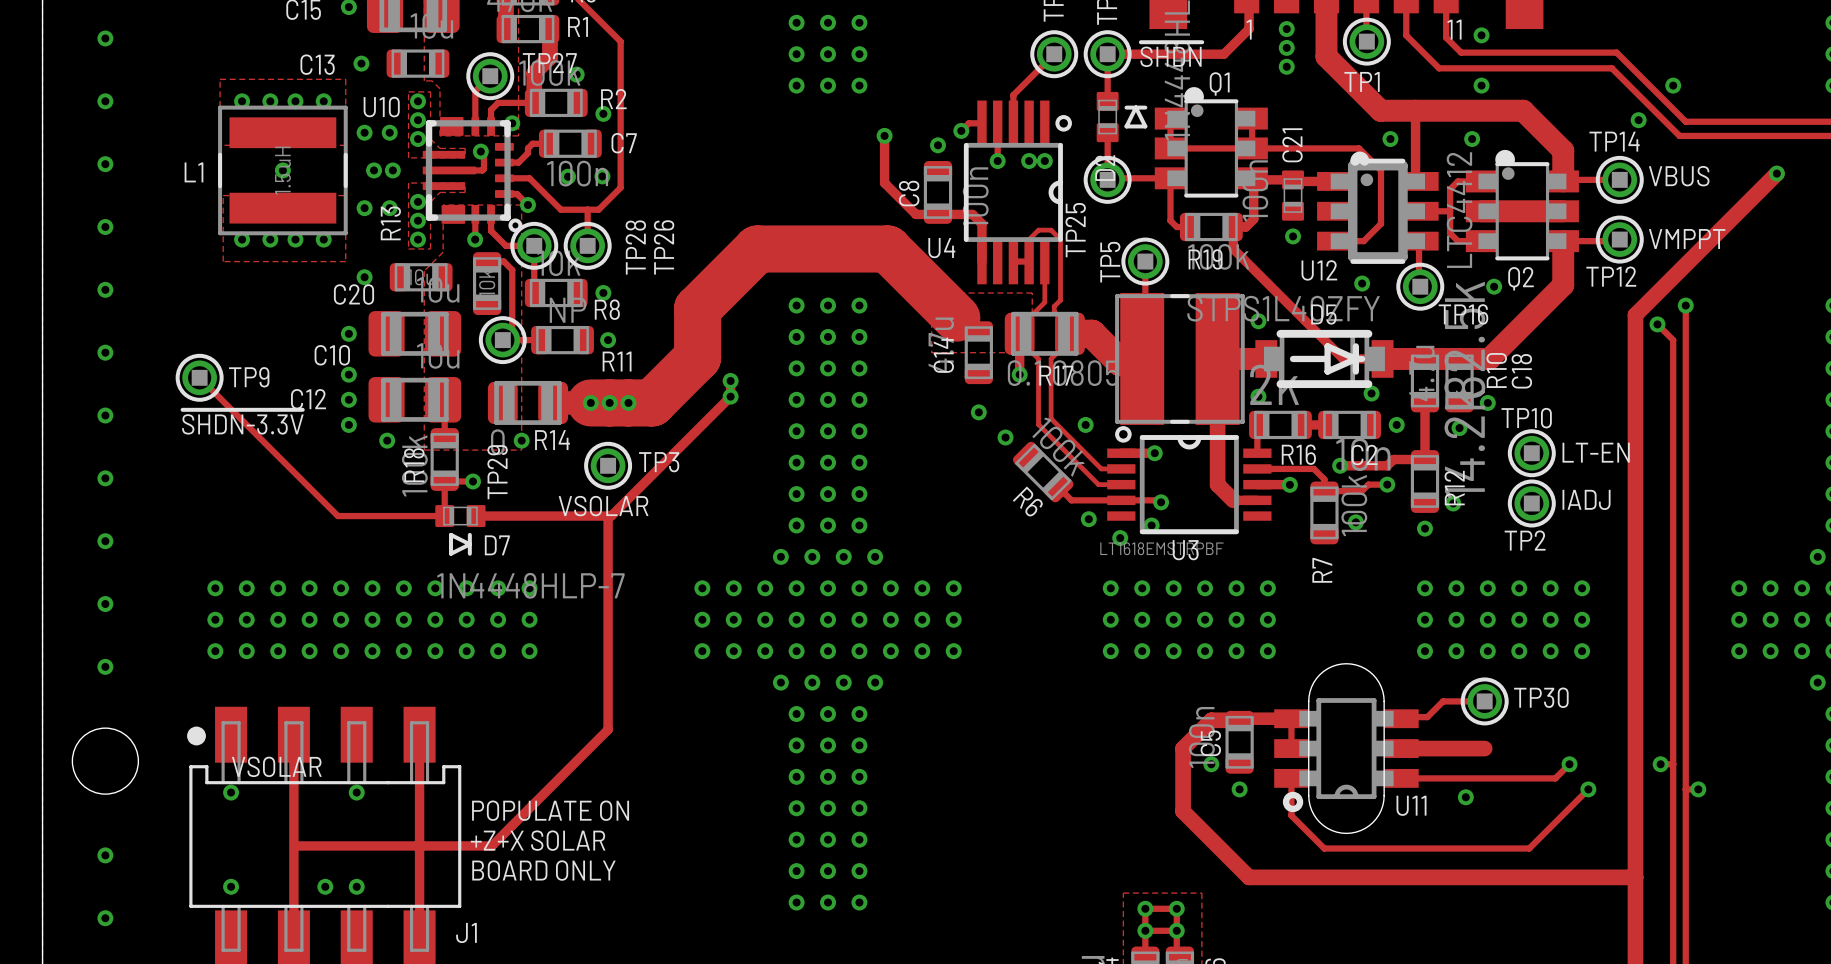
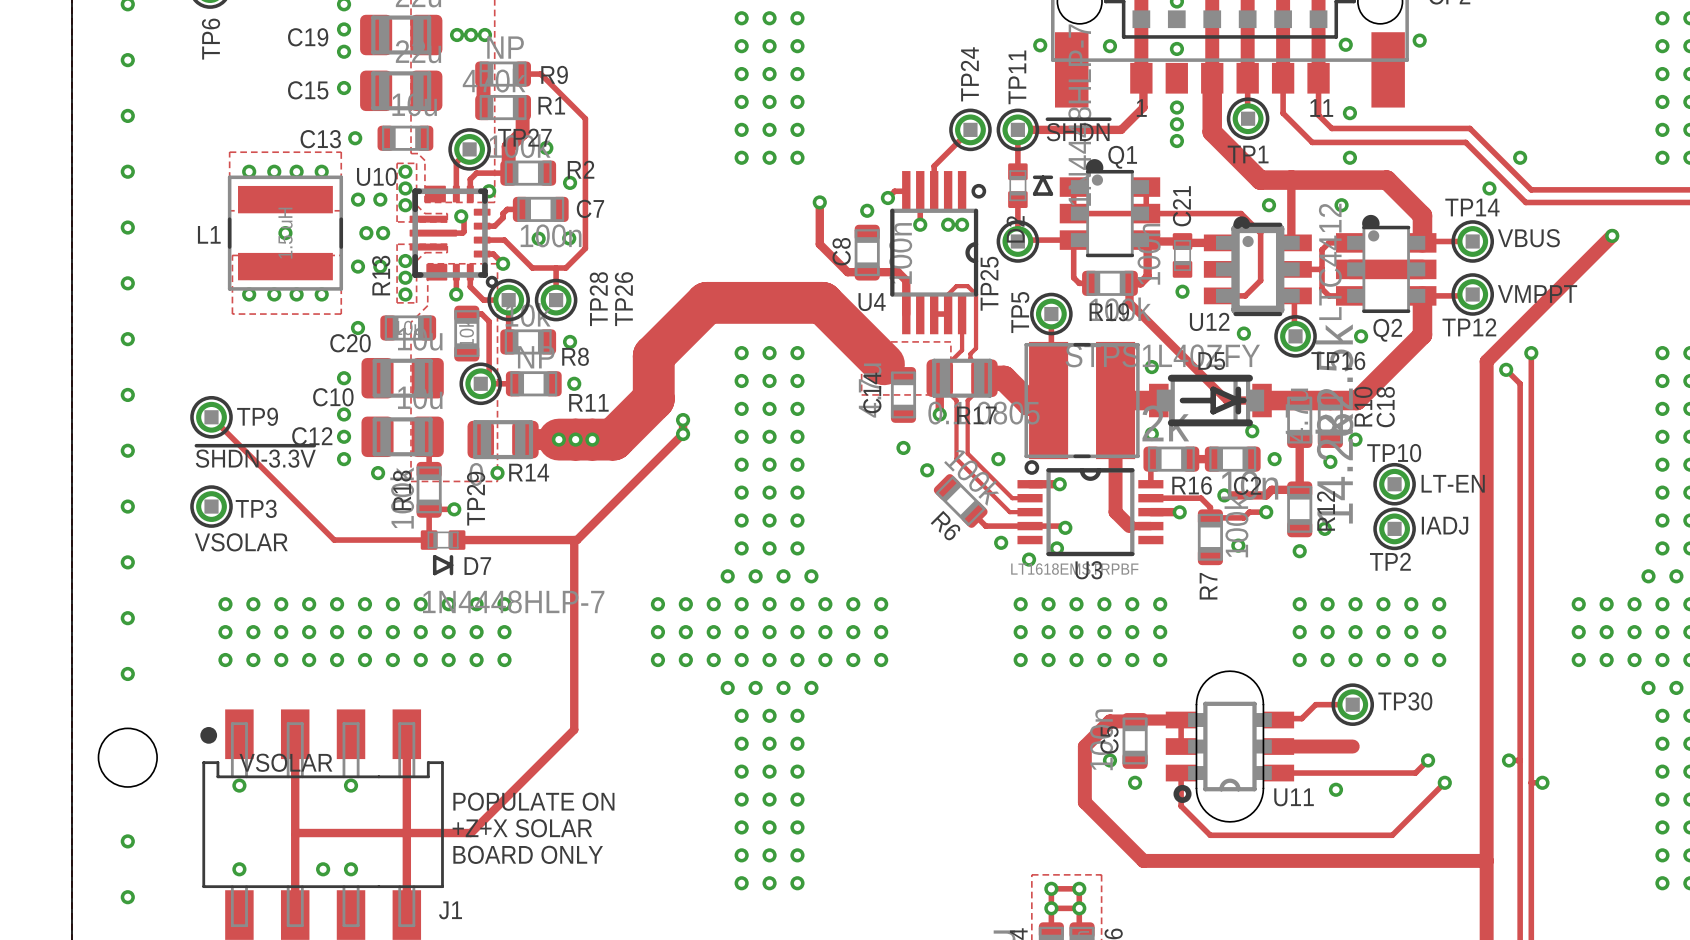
TP3 name position: TP3 (659, 462) -> TP3 (256, 508)
TP3 position: (608, 465) -> (211, 506)
text position: VSOLAR (603, 506) -> VSOLAR (241, 542)

